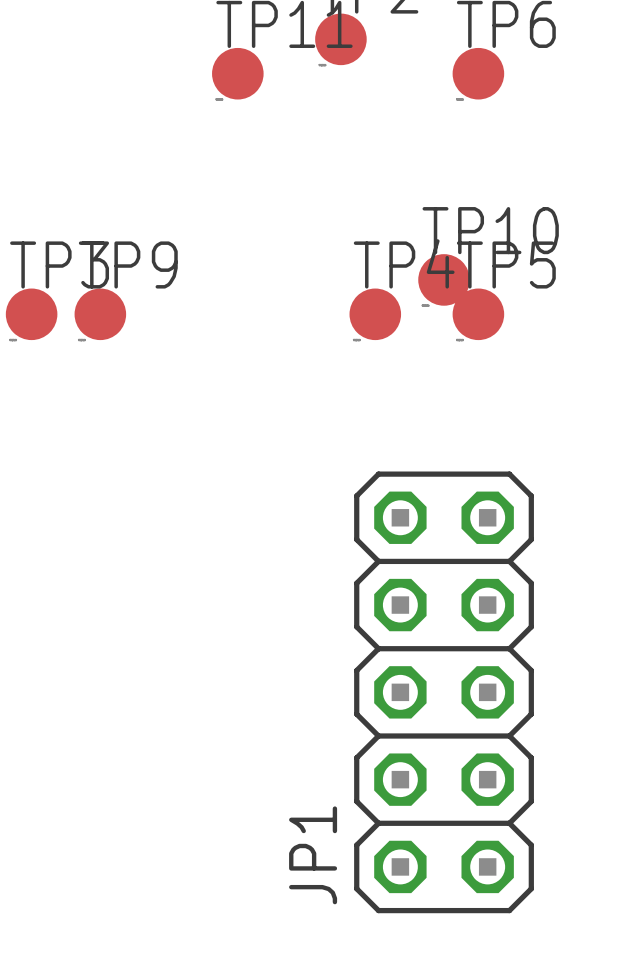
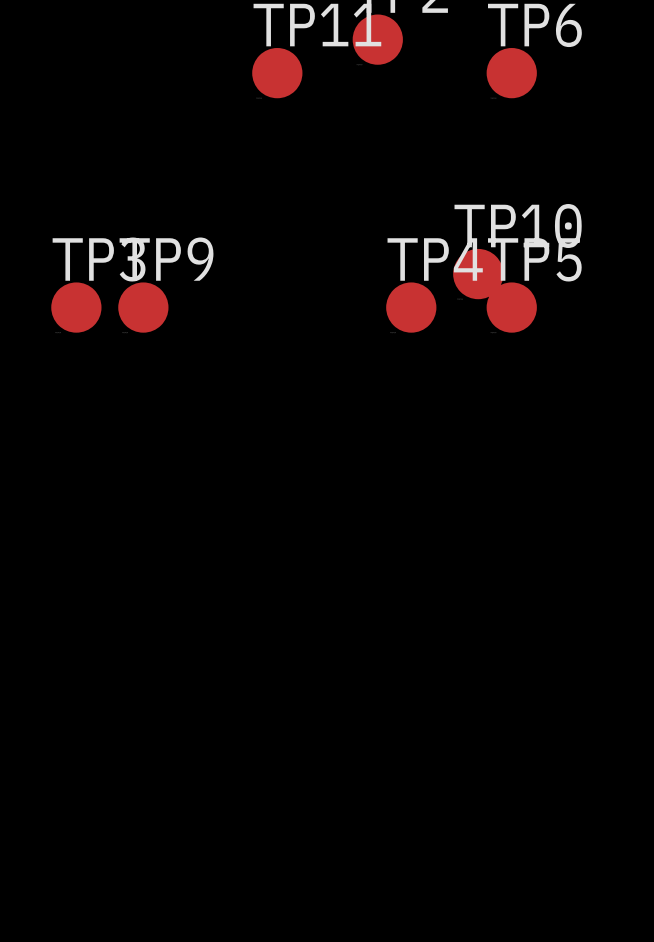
JP1: (444, 692) -> none

